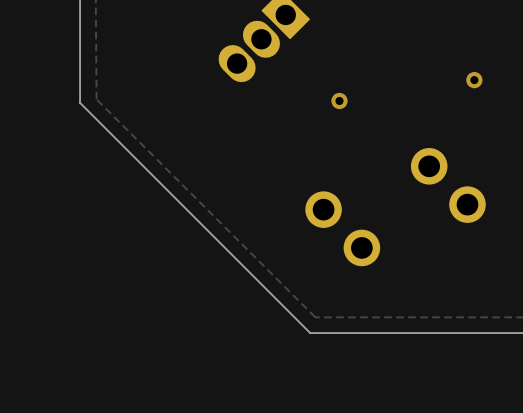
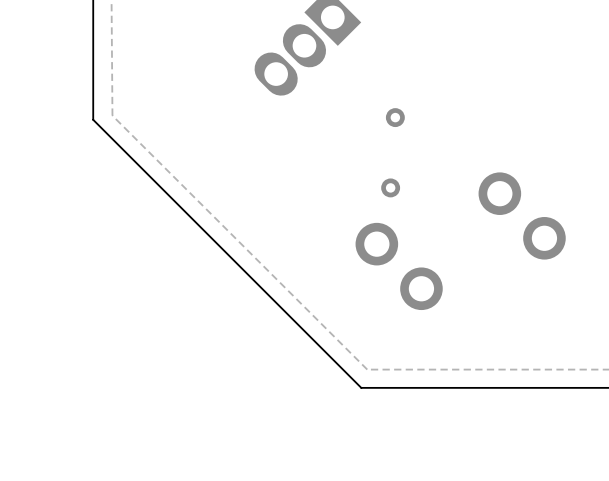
via position: (474, 80) -> (390, 187)

